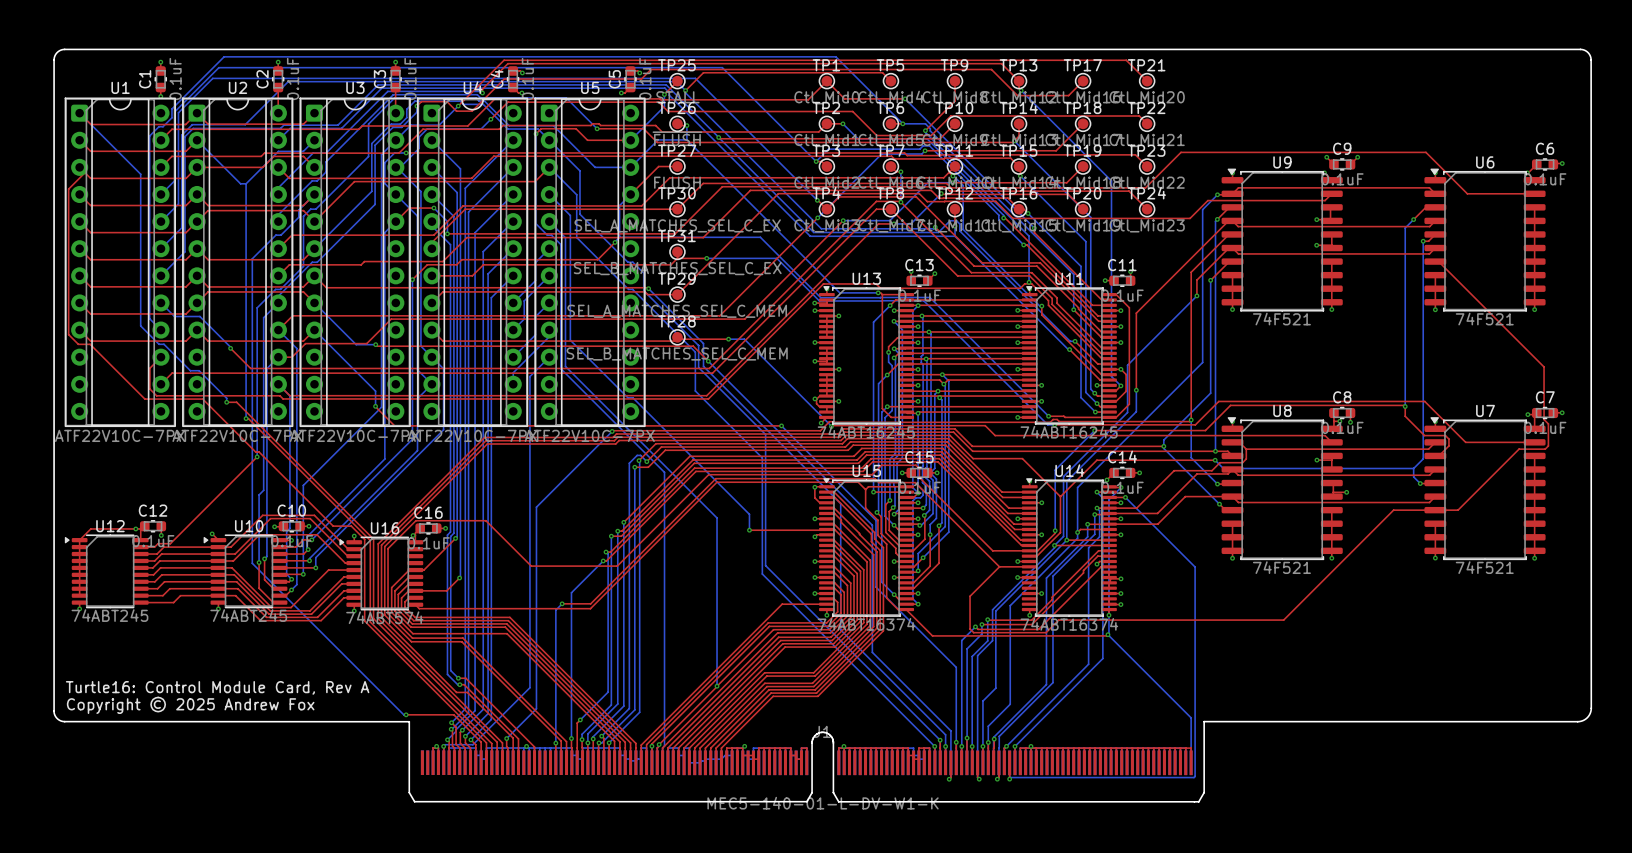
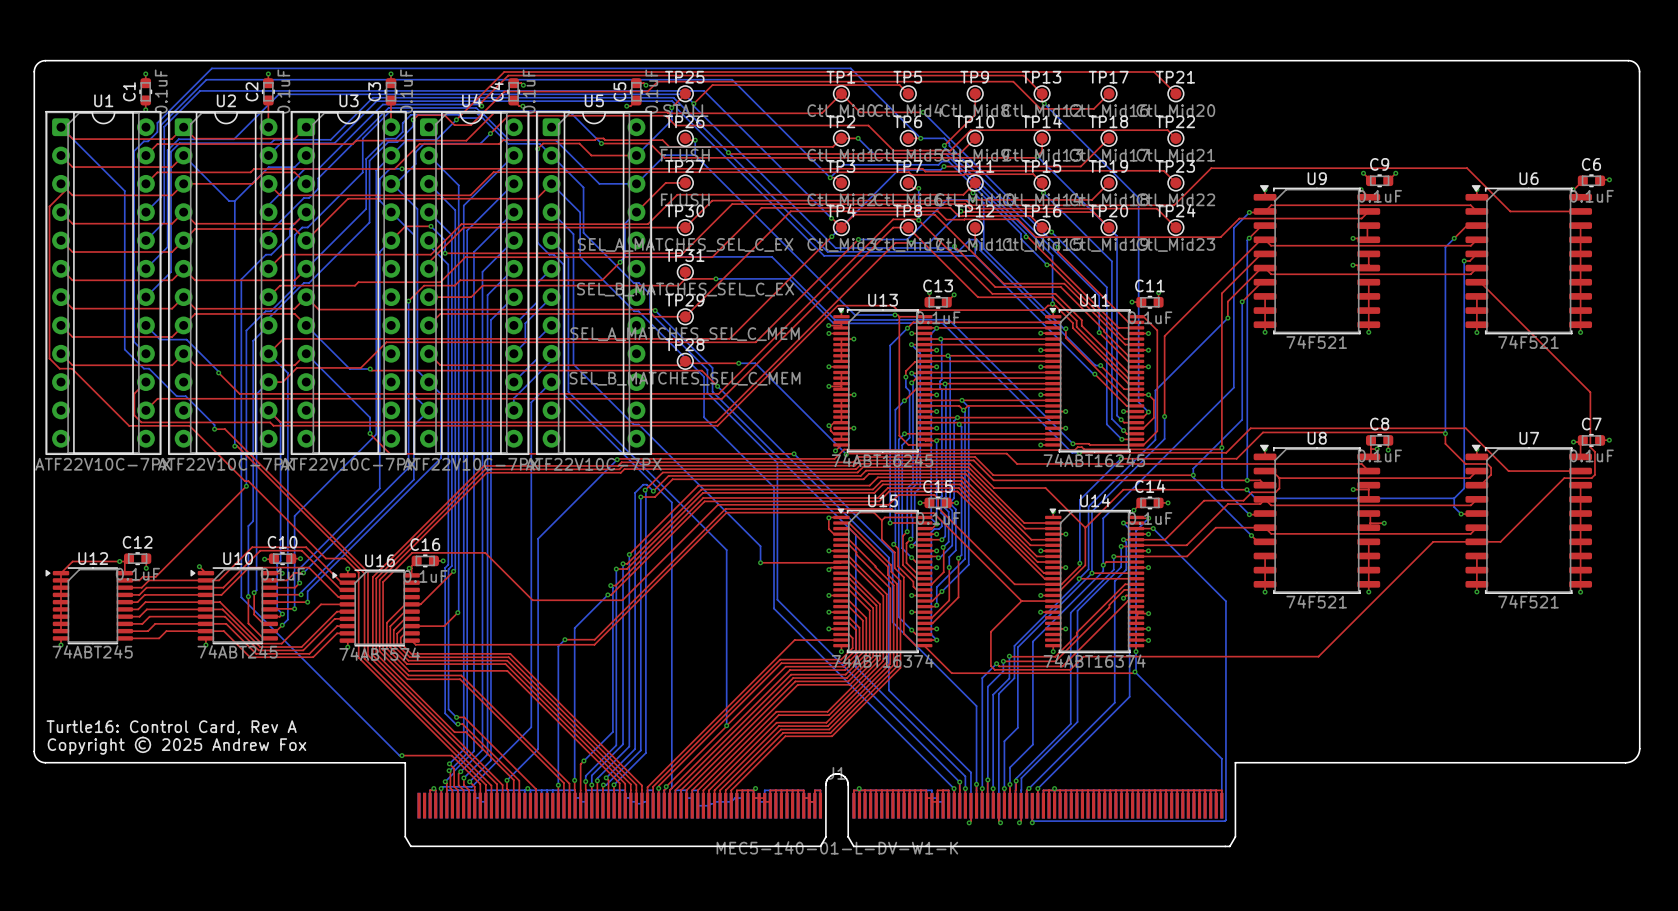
text: Turtle16: Control Module Card, Rev A (217, 687) -> Turtle16: Control Card, Rev A (171, 727)

